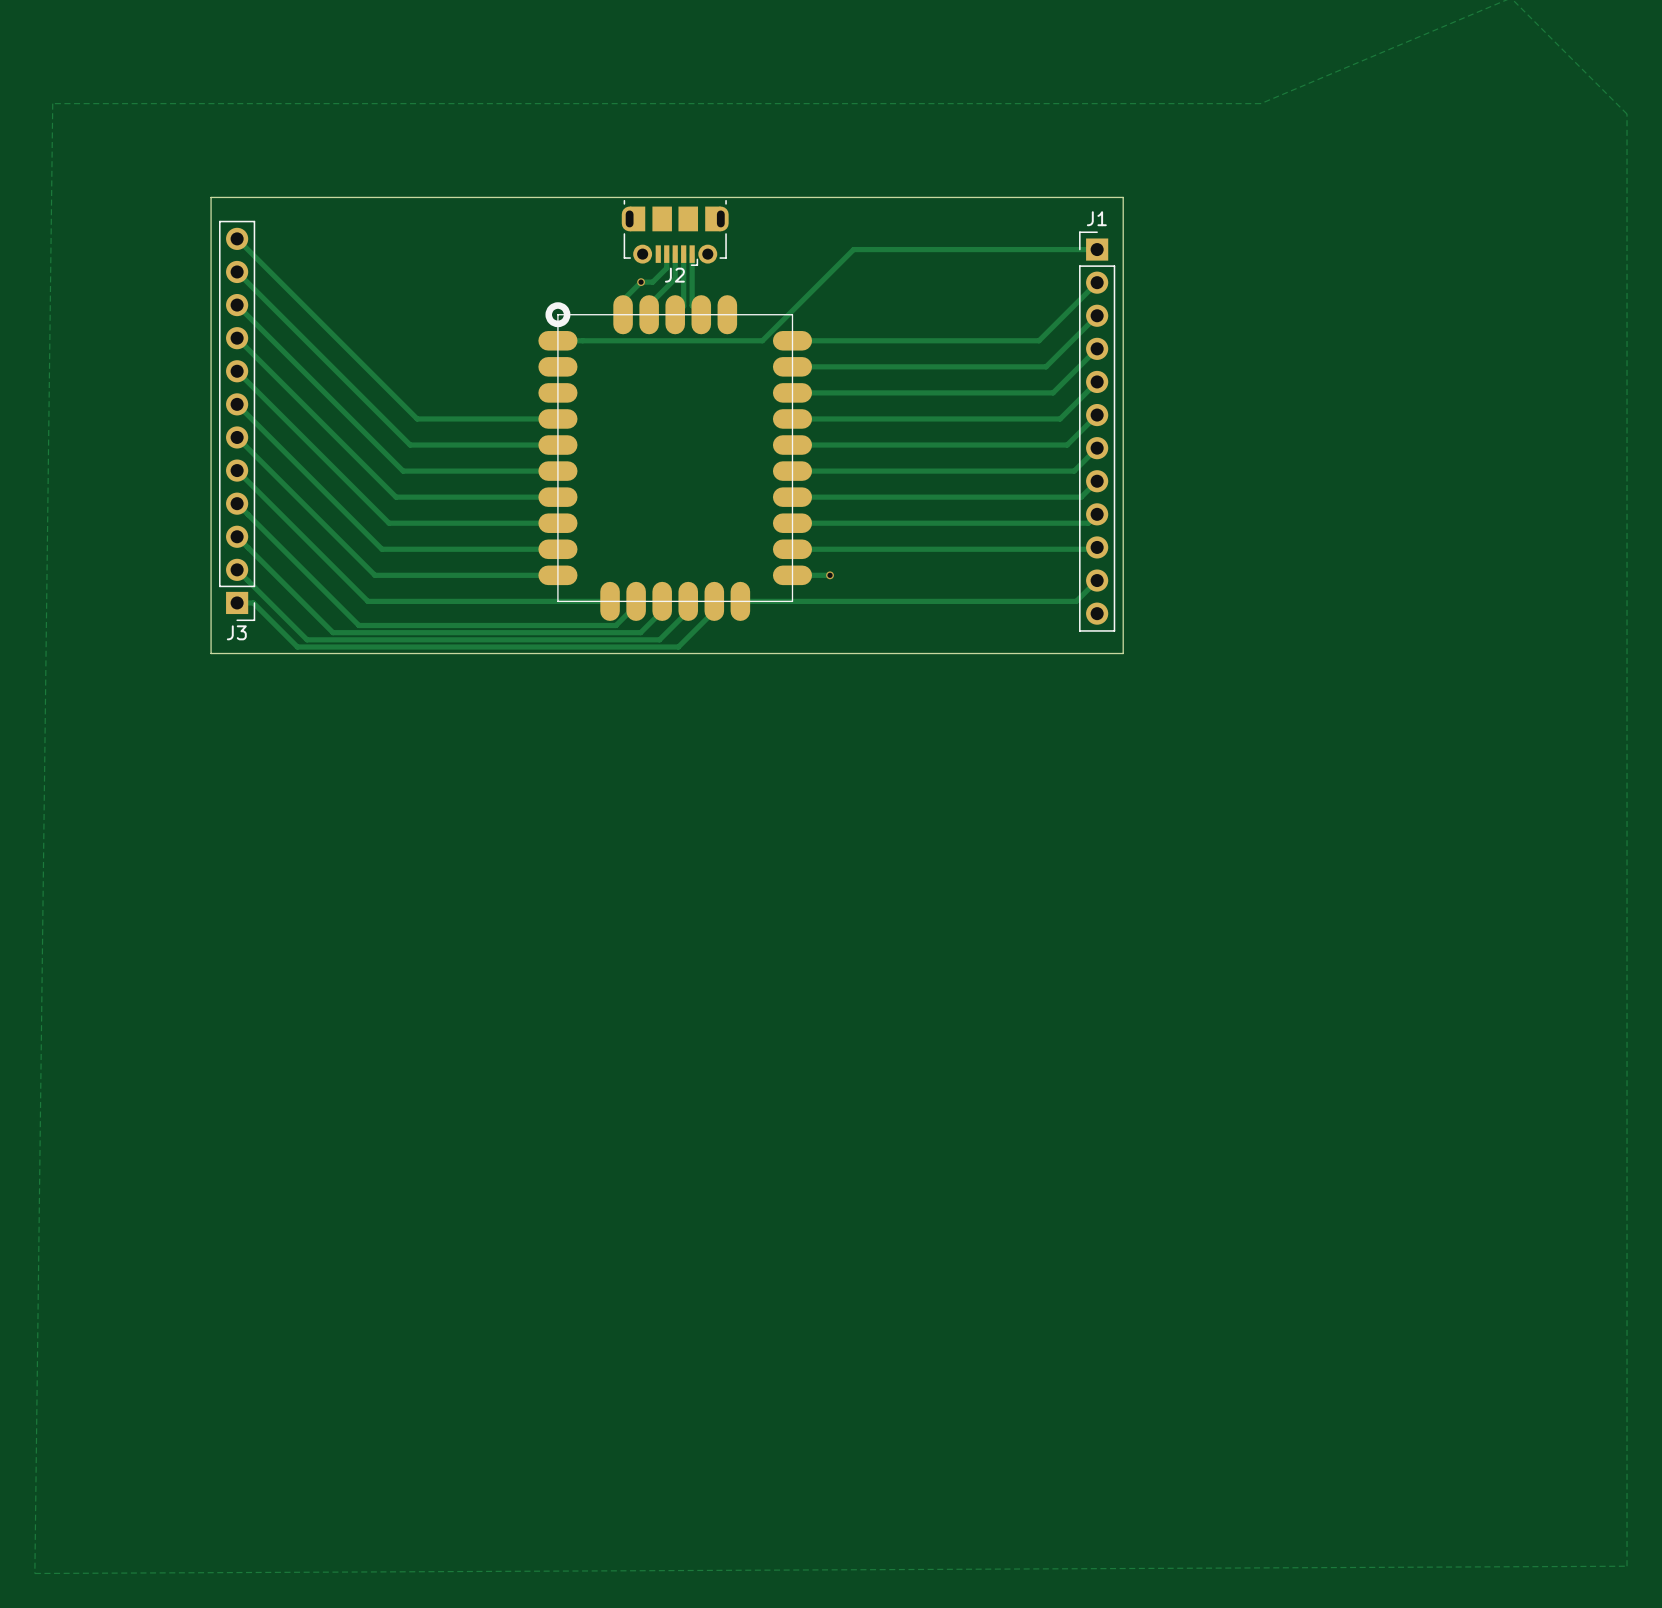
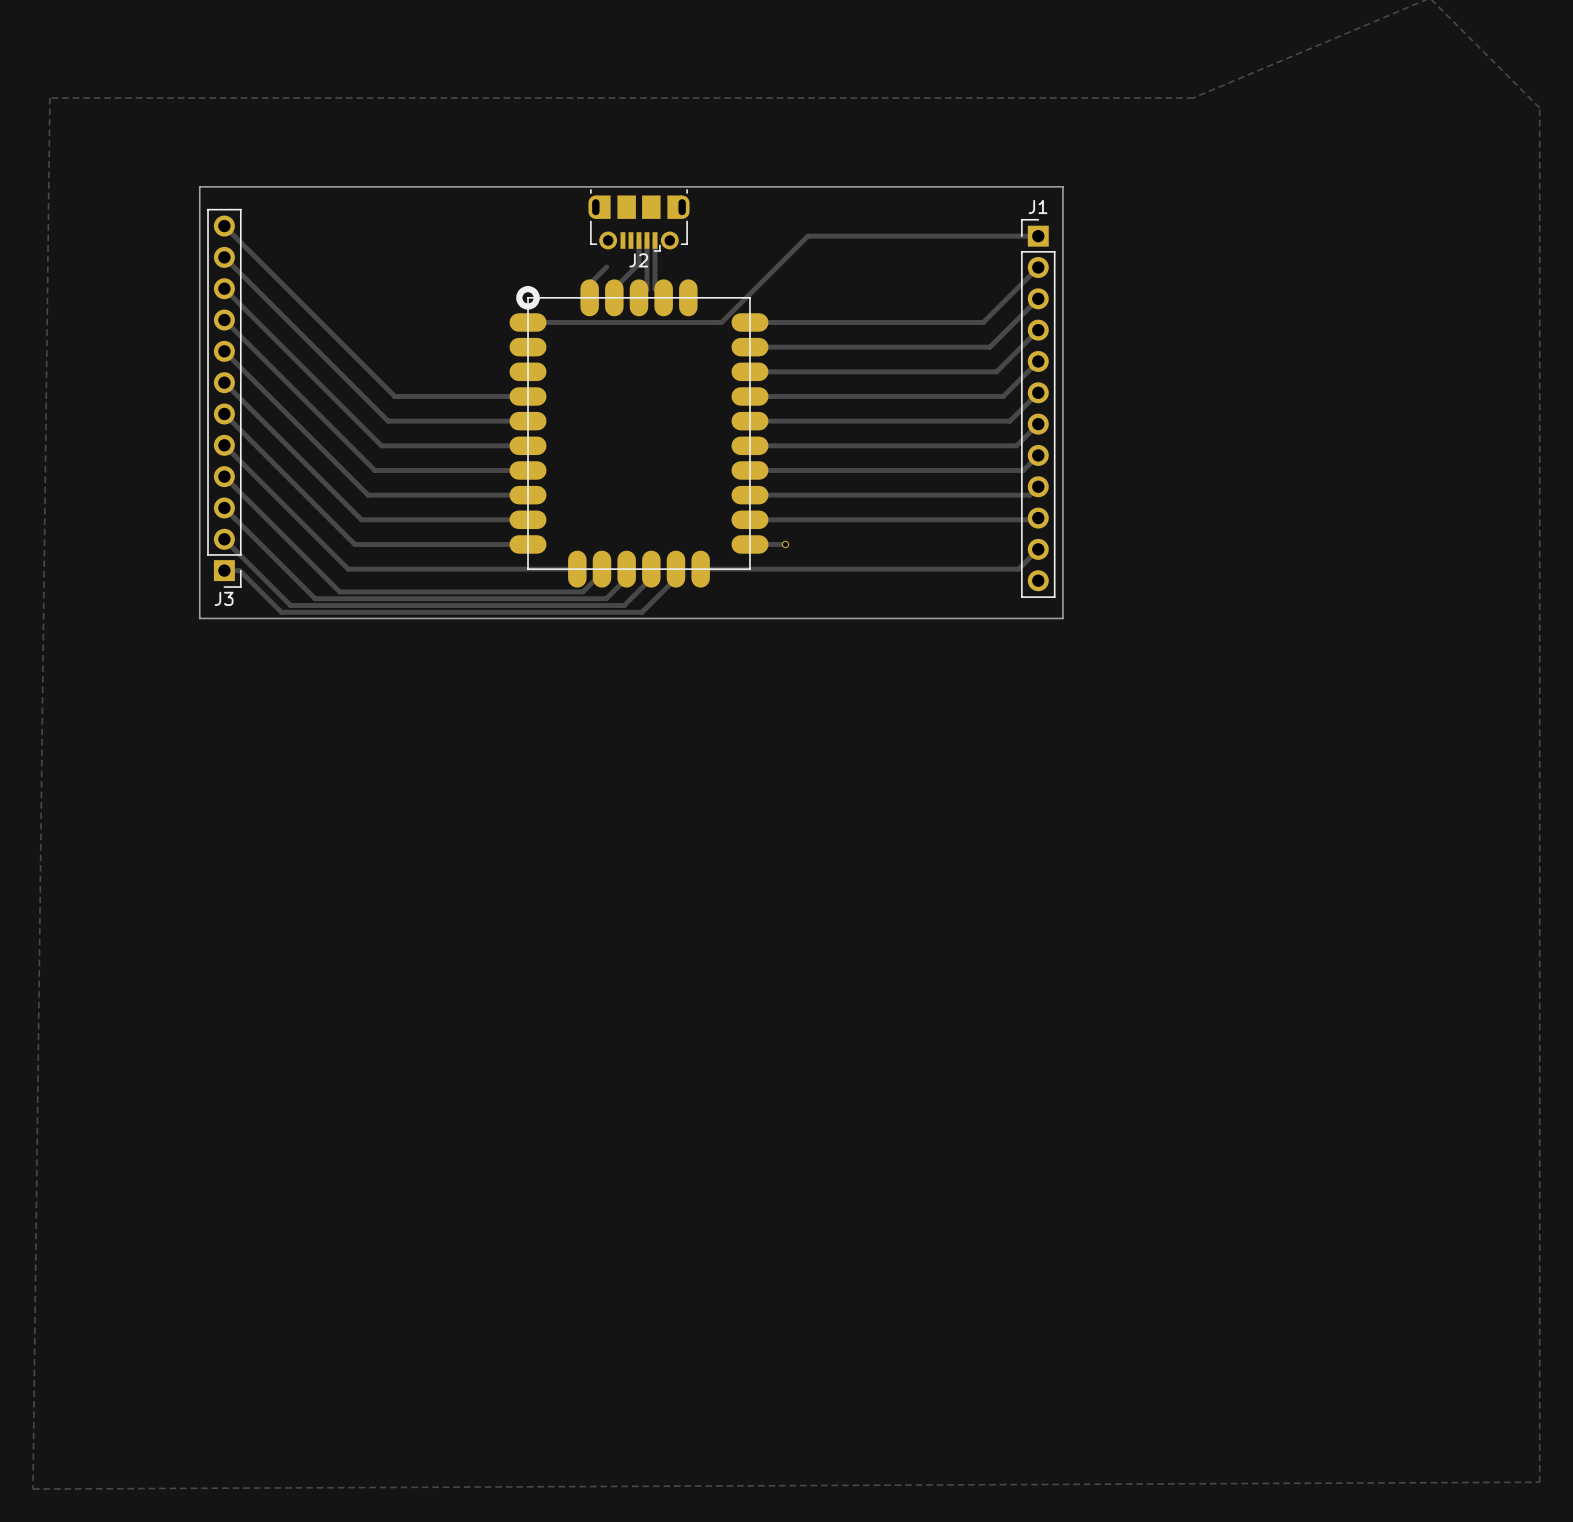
track: (666, 254) (666, 268) (652, 282) (641, 282) -> none
via: (641, 282) -> none

